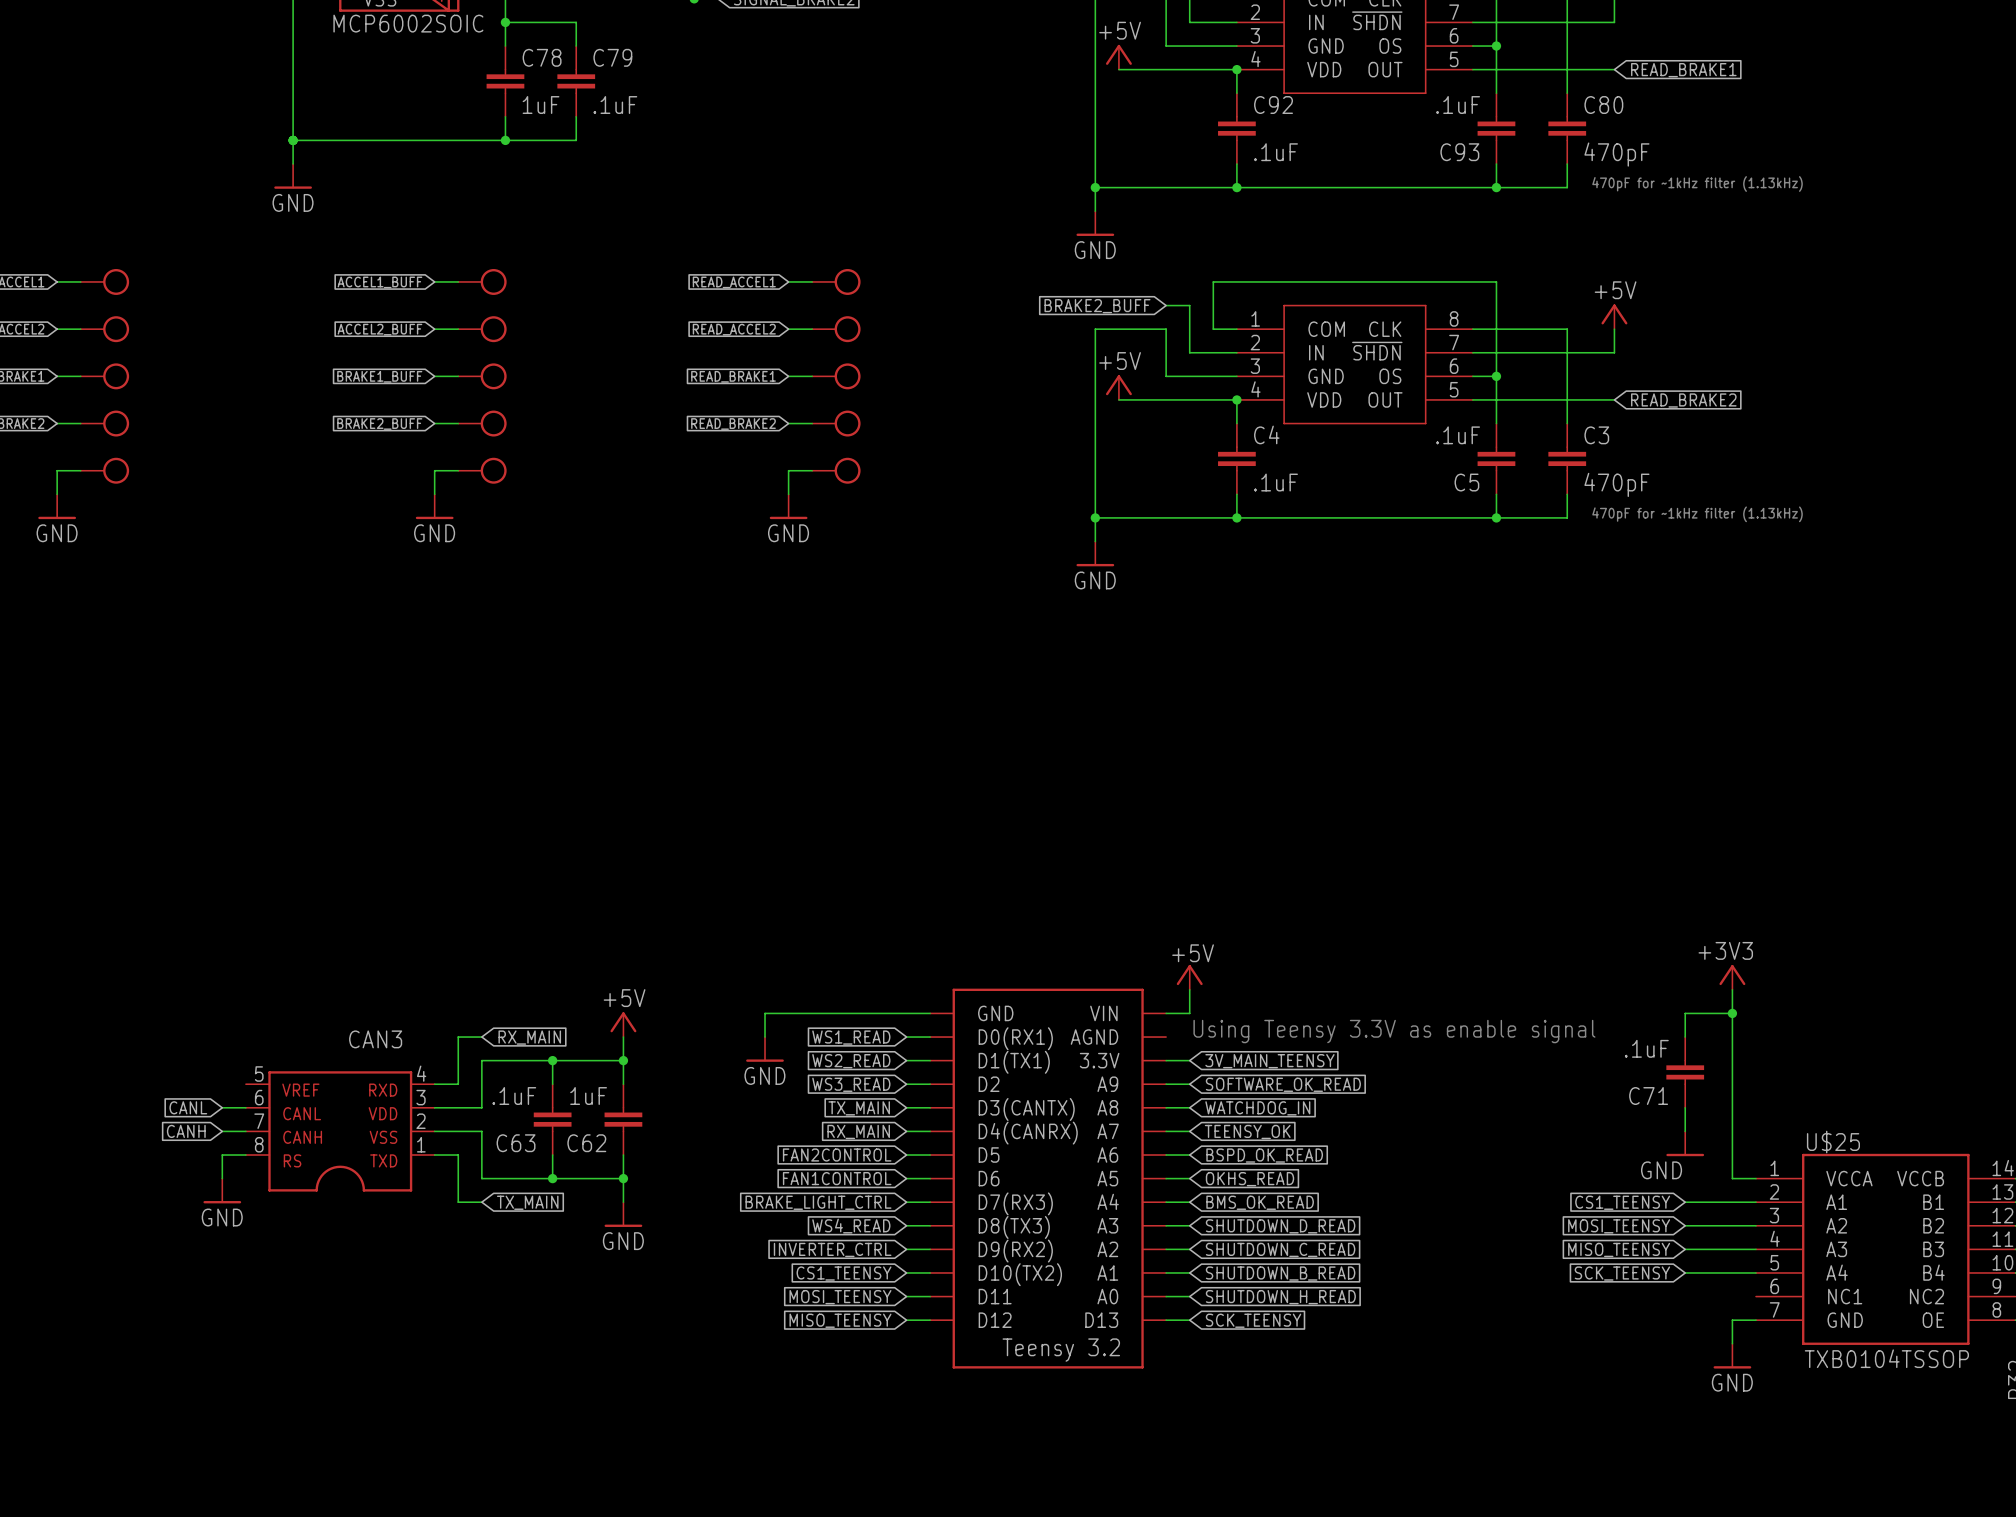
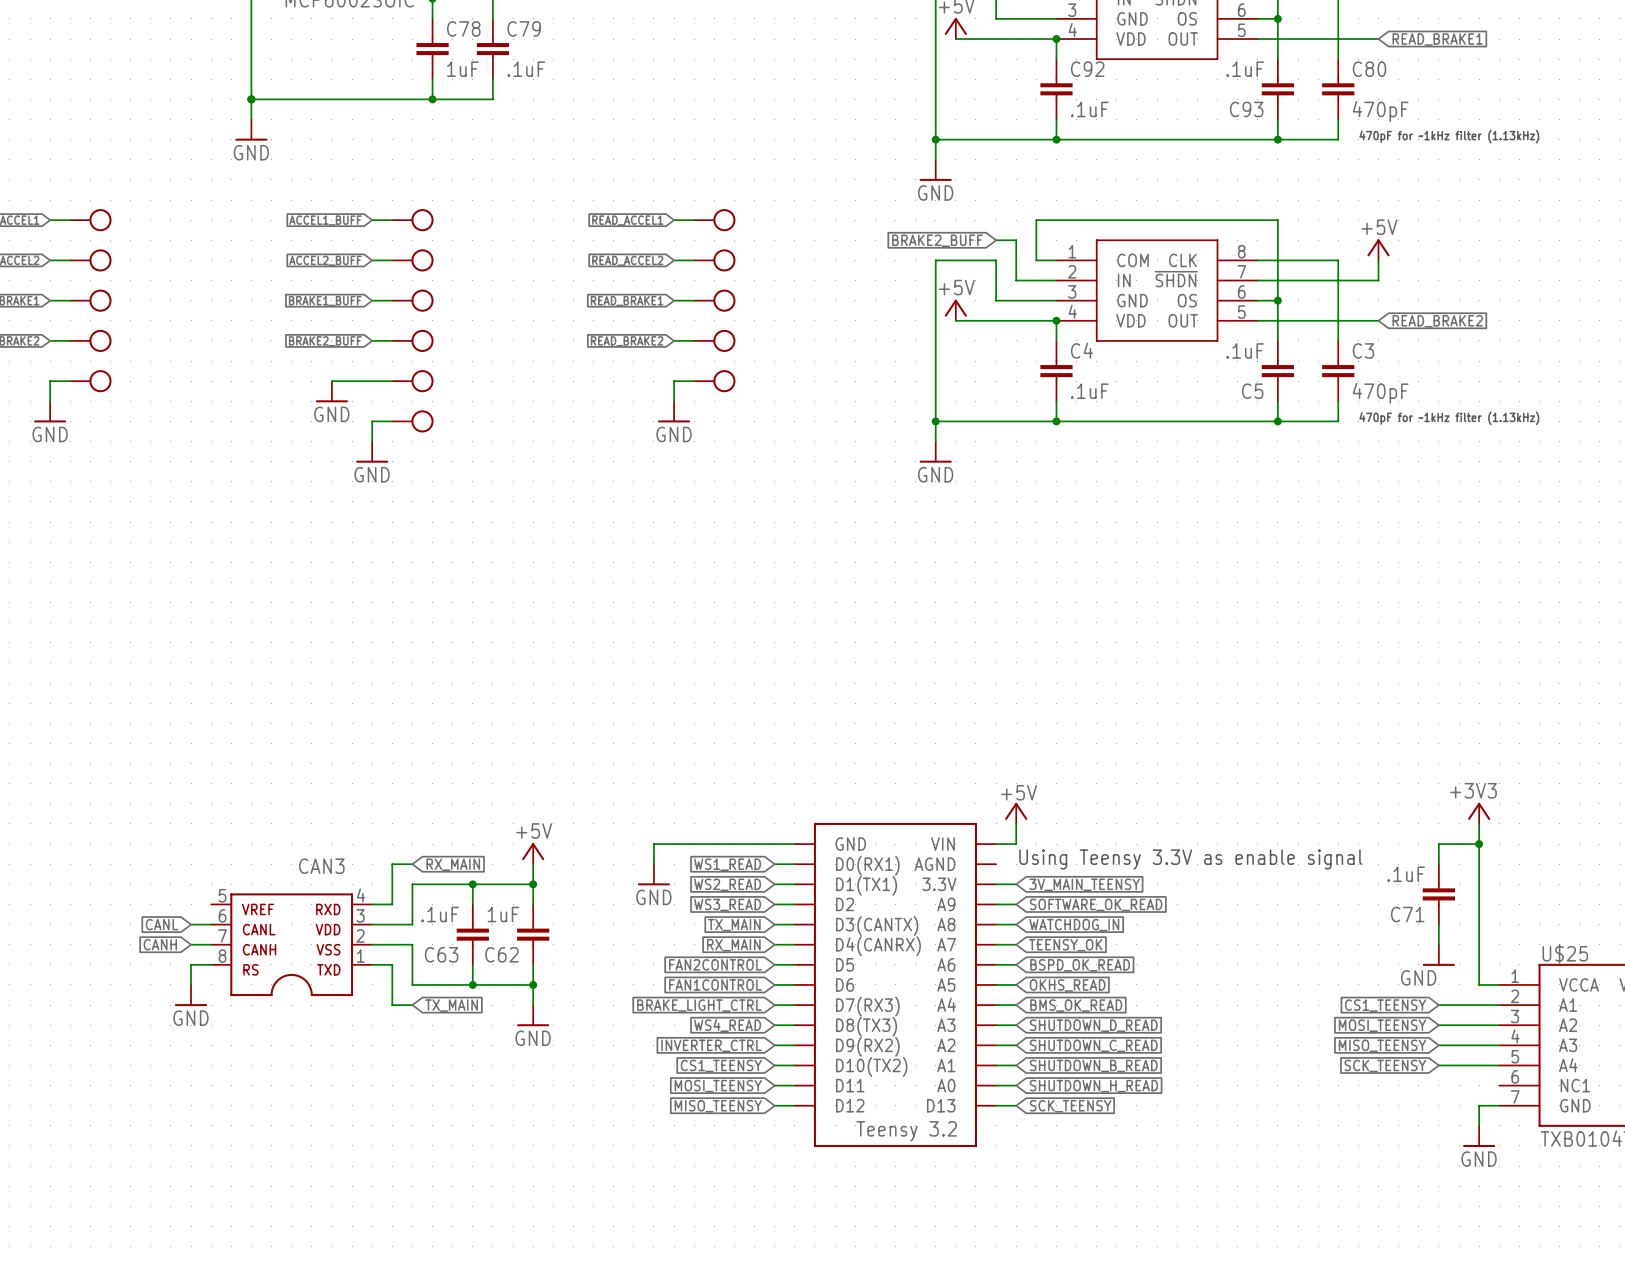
wire: (434, 470) (434, 494) -> (372, 381) (331, 381)
power symbol: none -> GND (331, 391)
power symbol: GND (434, 506) -> none
wire: none -> (392, 421) (372, 421) (372, 441)
part: none -> (412, 421)
power symbol: none -> GND (372, 452)

